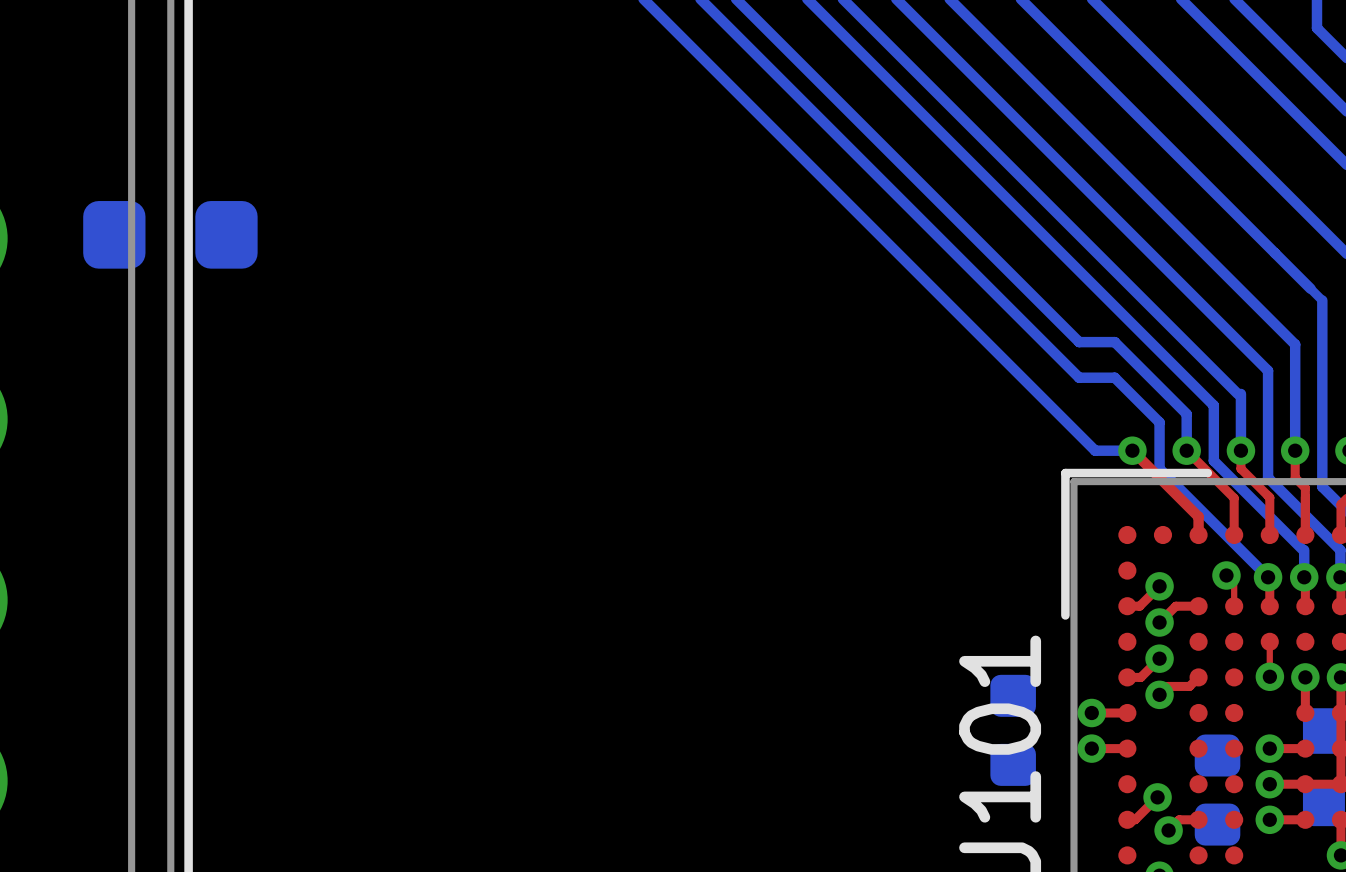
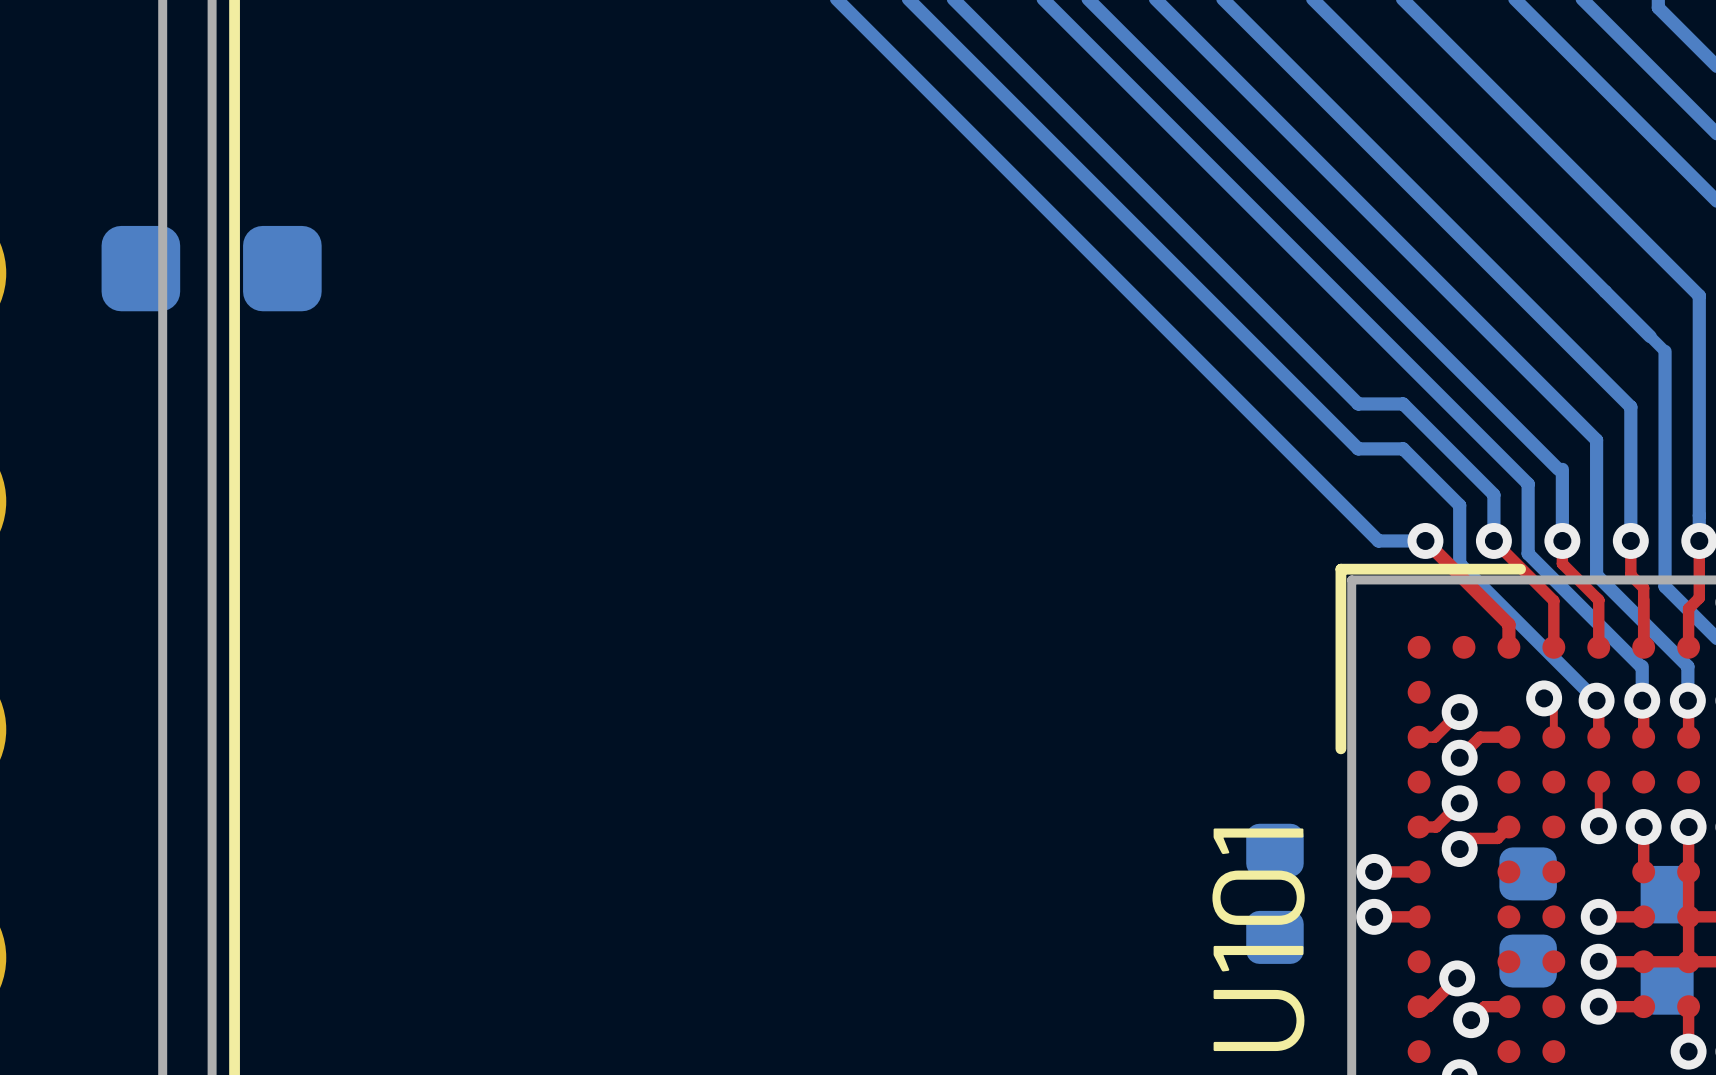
part position: (1217, 790) -> (1528, 917)

